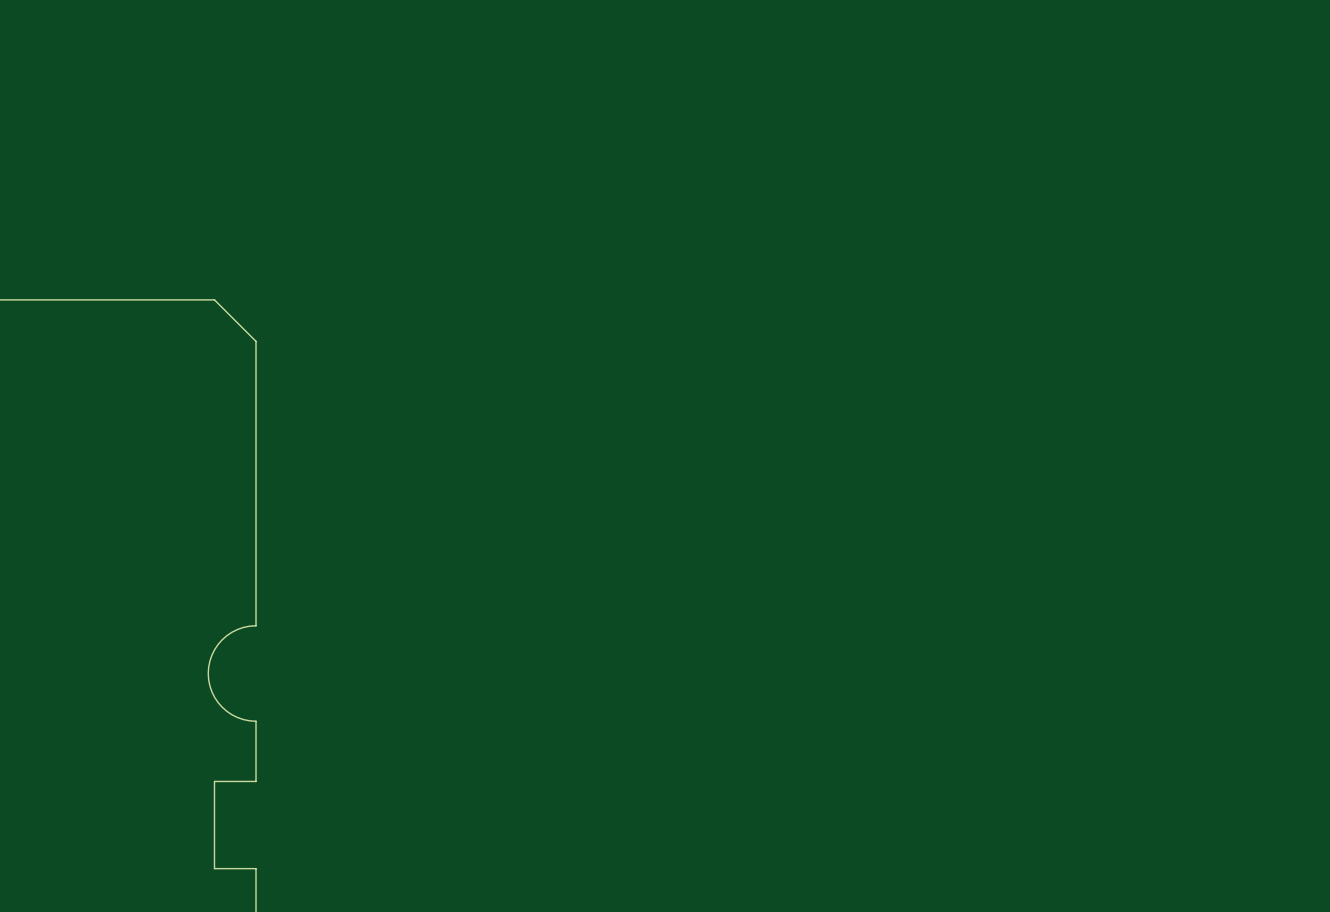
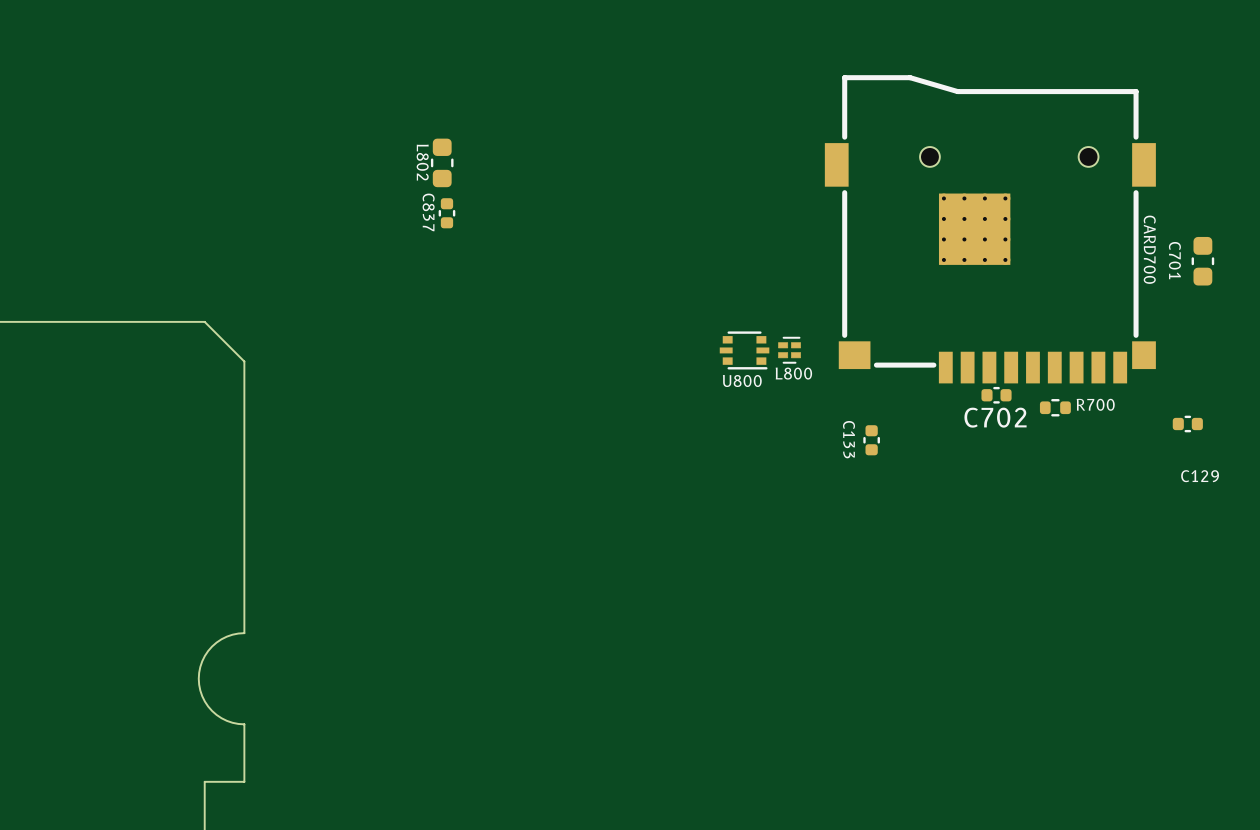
L802: none -> (442, 162)
C837: none -> (446, 213)
part: none -> (974, 229)
CARD700: none -> (990, 229)
C701: none -> (1202, 261)
U800: none -> (744, 350)
L800: none -> (789, 350)
C702: none -> (996, 395)
R700: none -> (1055, 407)
C129: none -> (1187, 424)
C133: none -> (871, 440)

